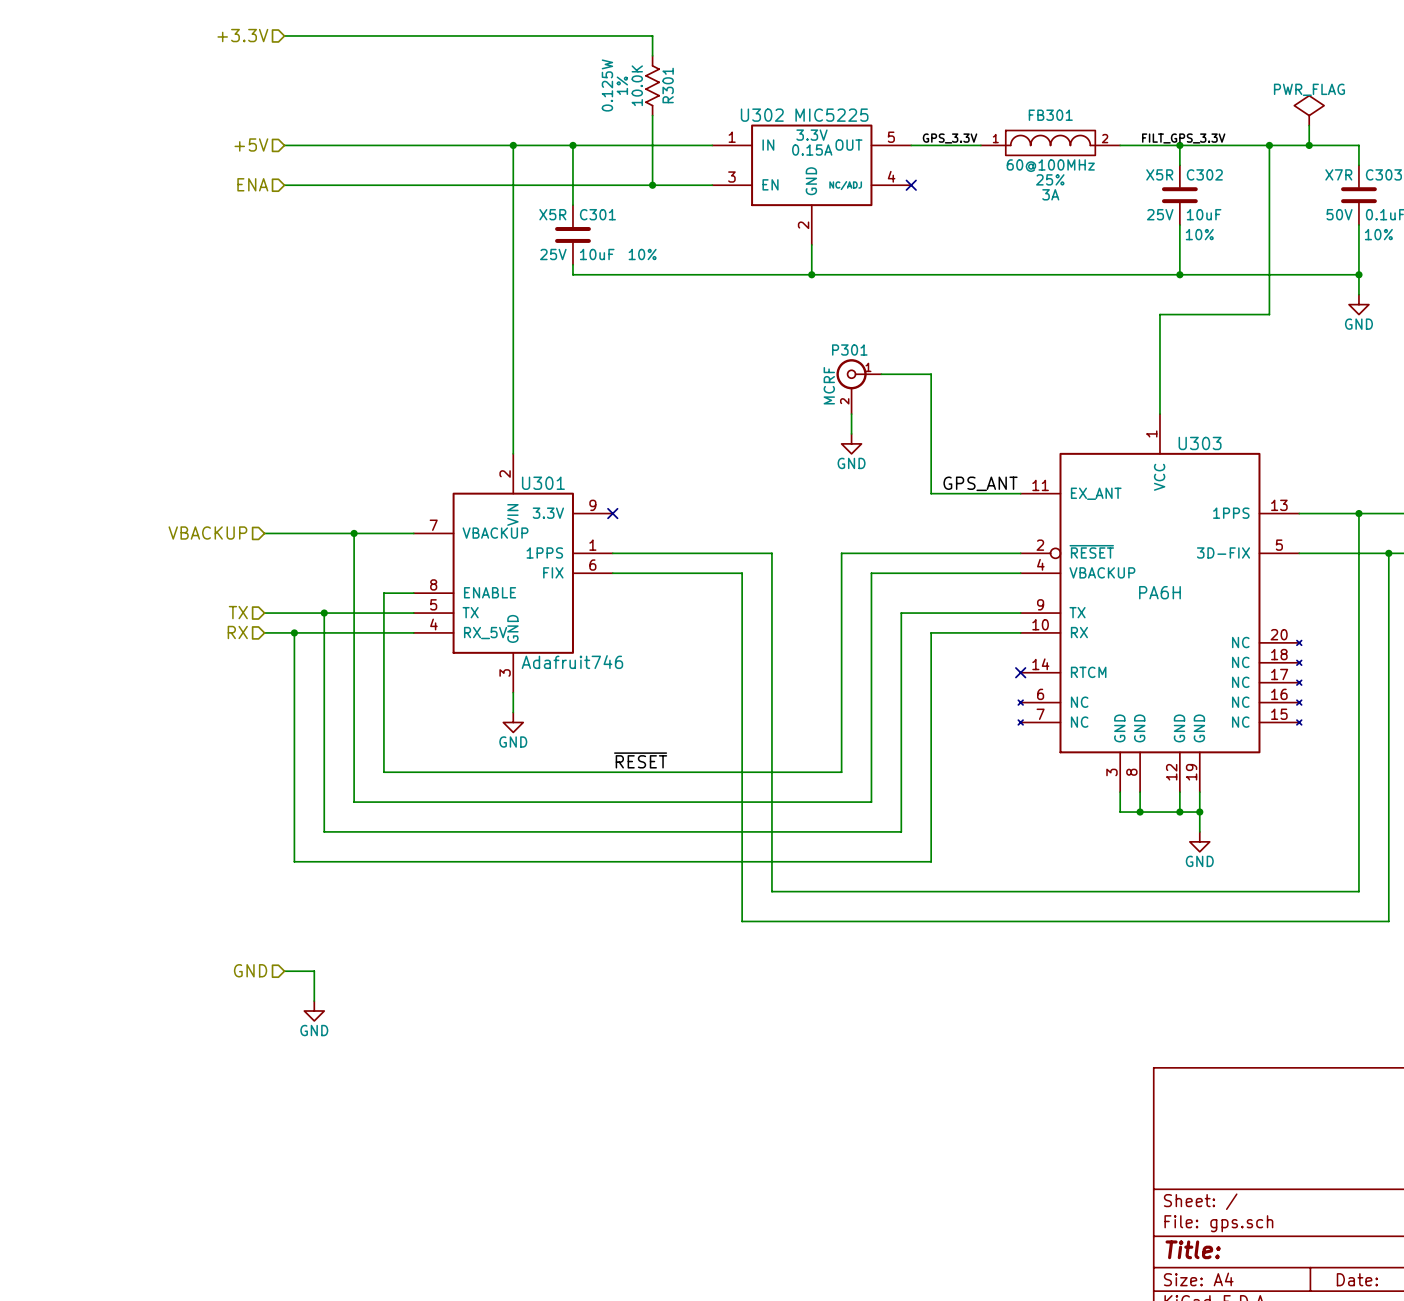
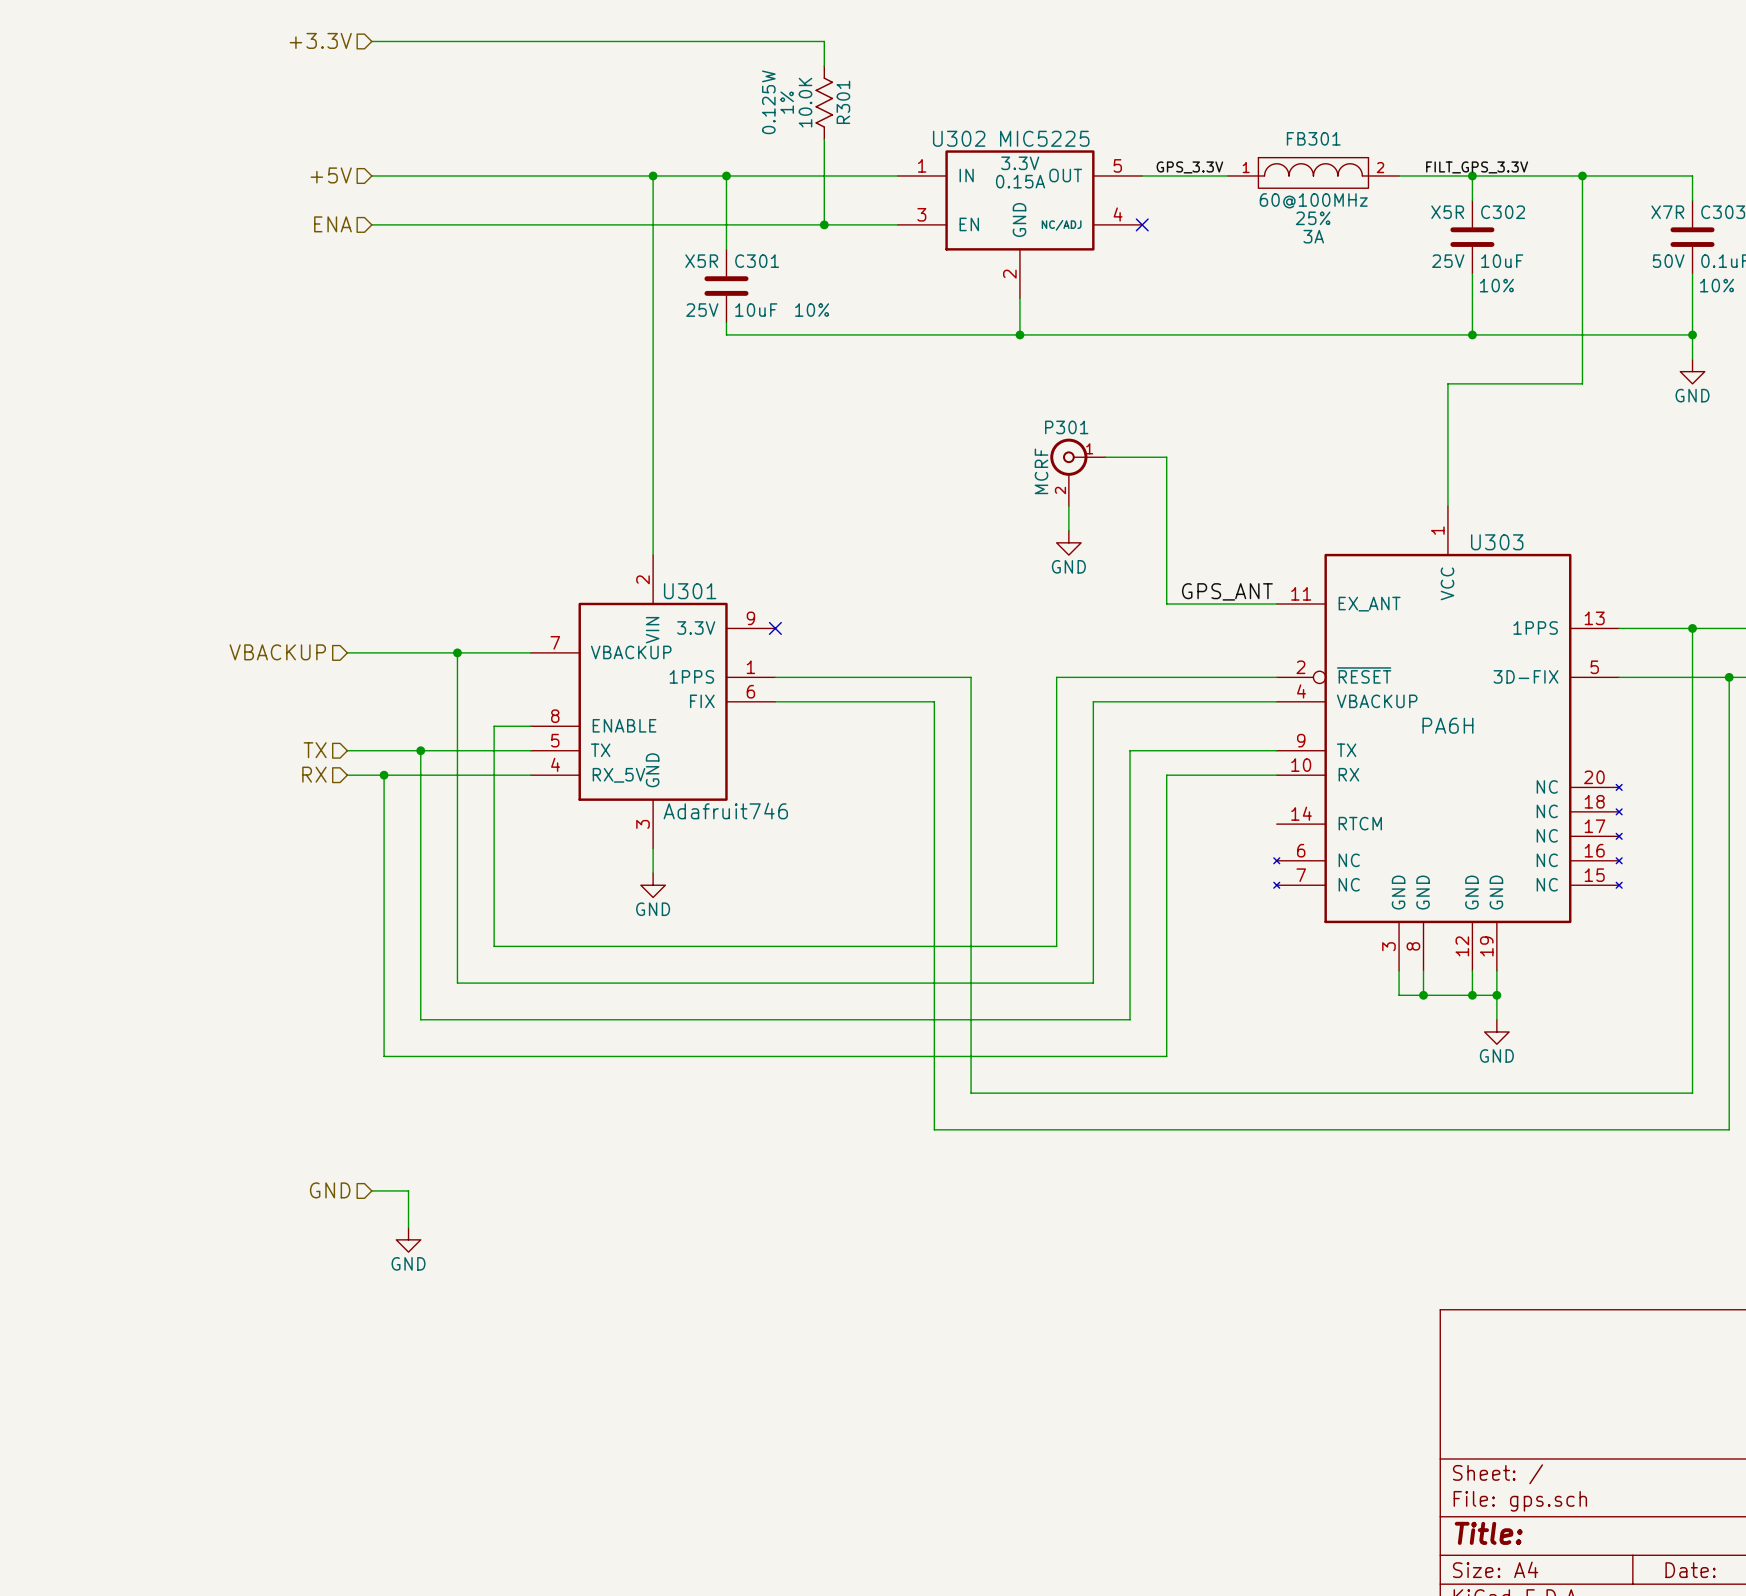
power symbol: PWR_FLAG (1309, 110) -> none
wire: (1309, 125) (1309, 145) -> none
junction: (1309, 145) -> none
no-connect mark: (1020, 672) -> none
label: ~{RESET} (640, 760) -> none

